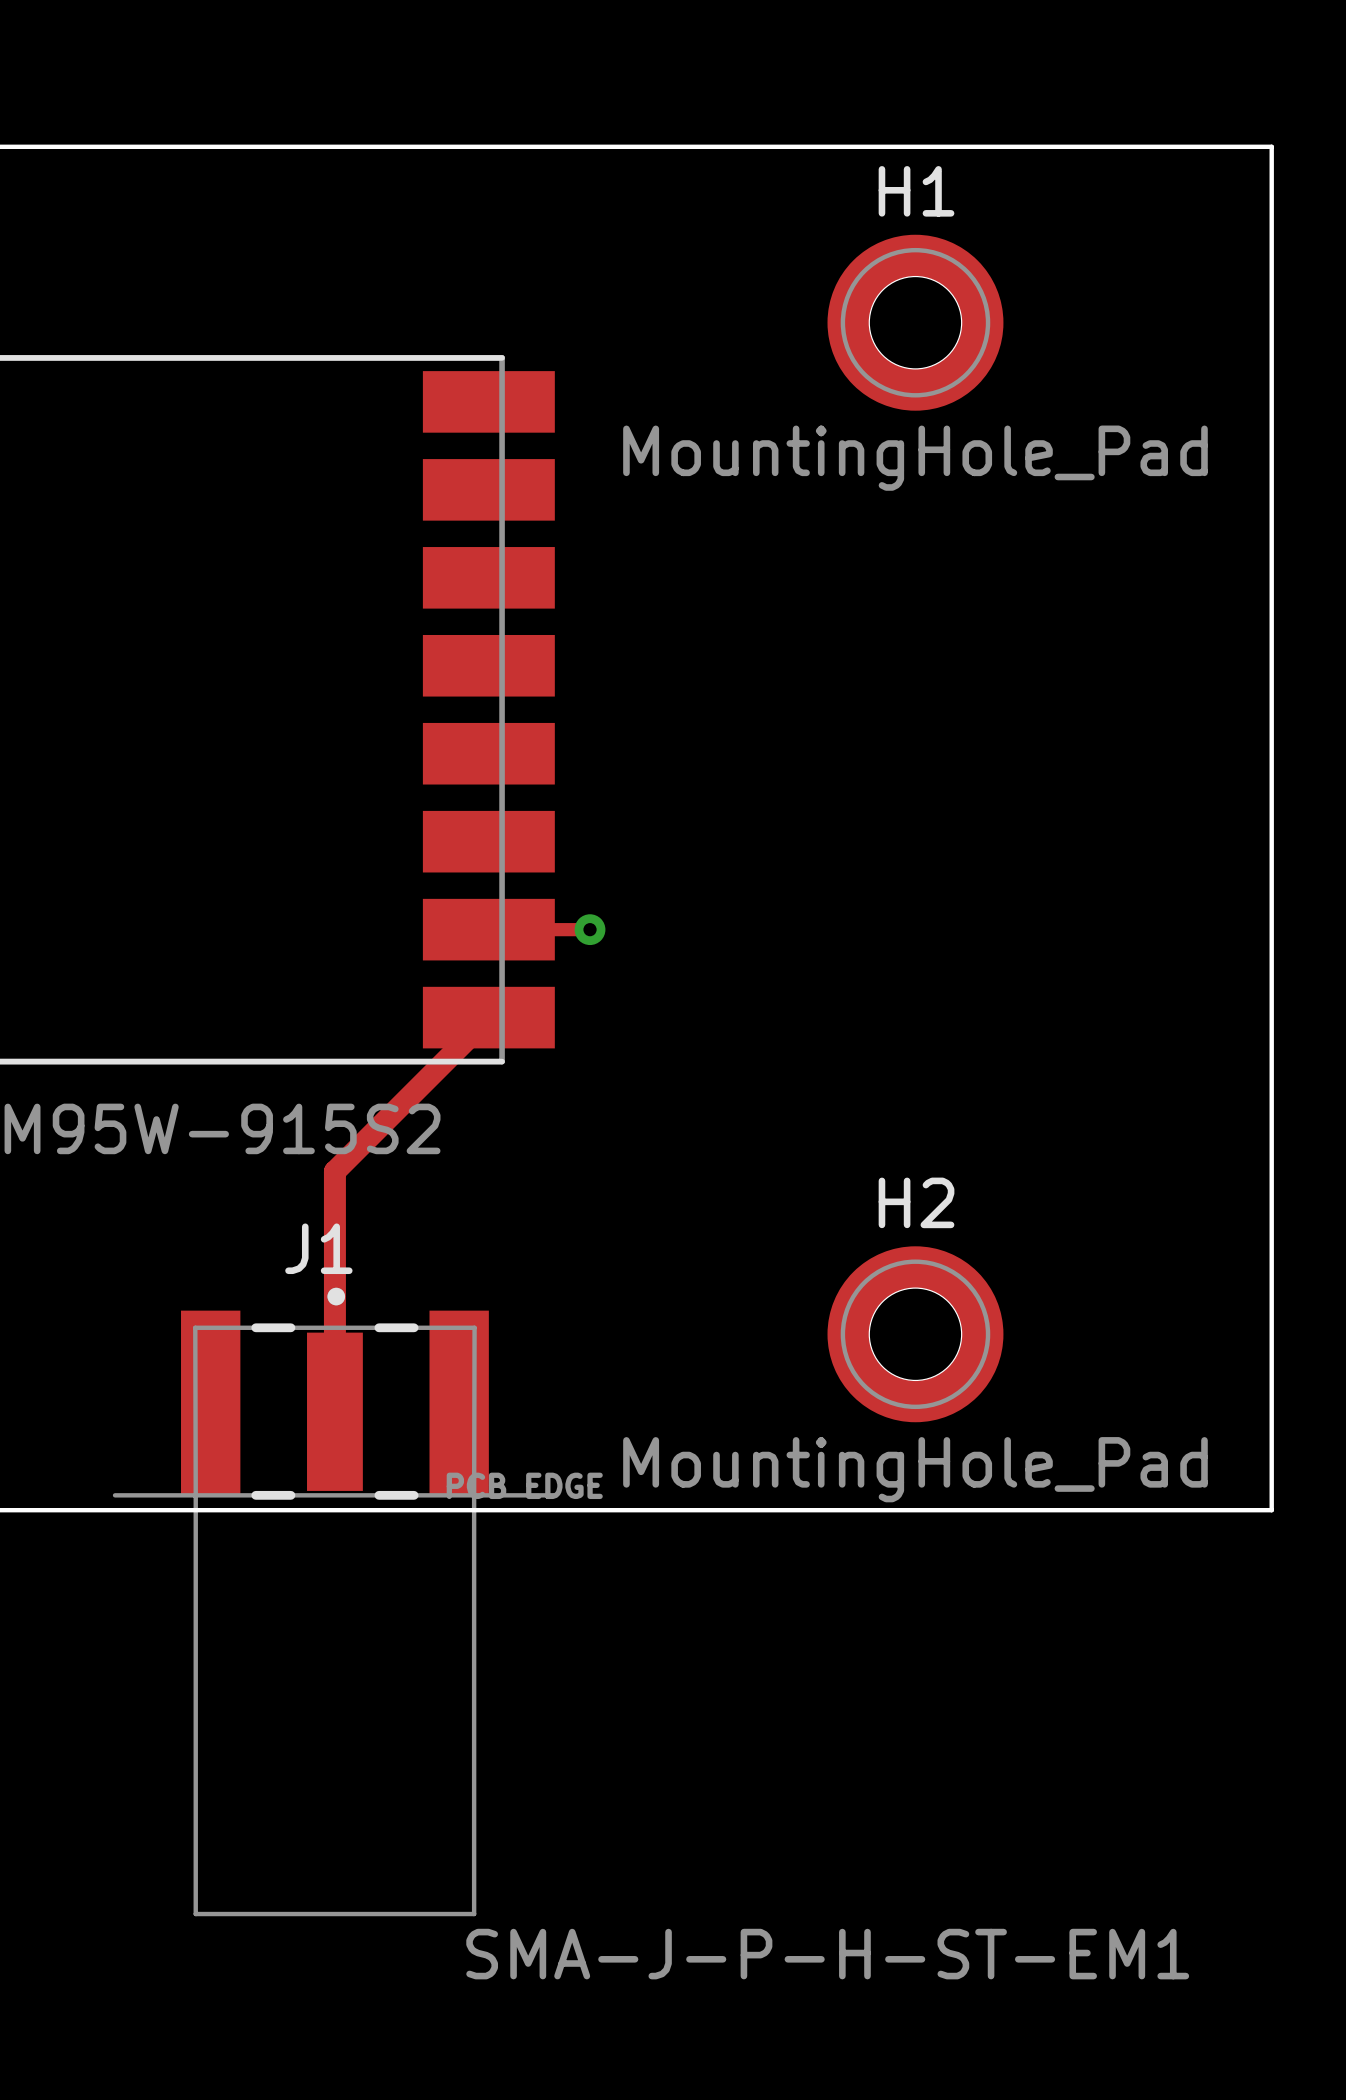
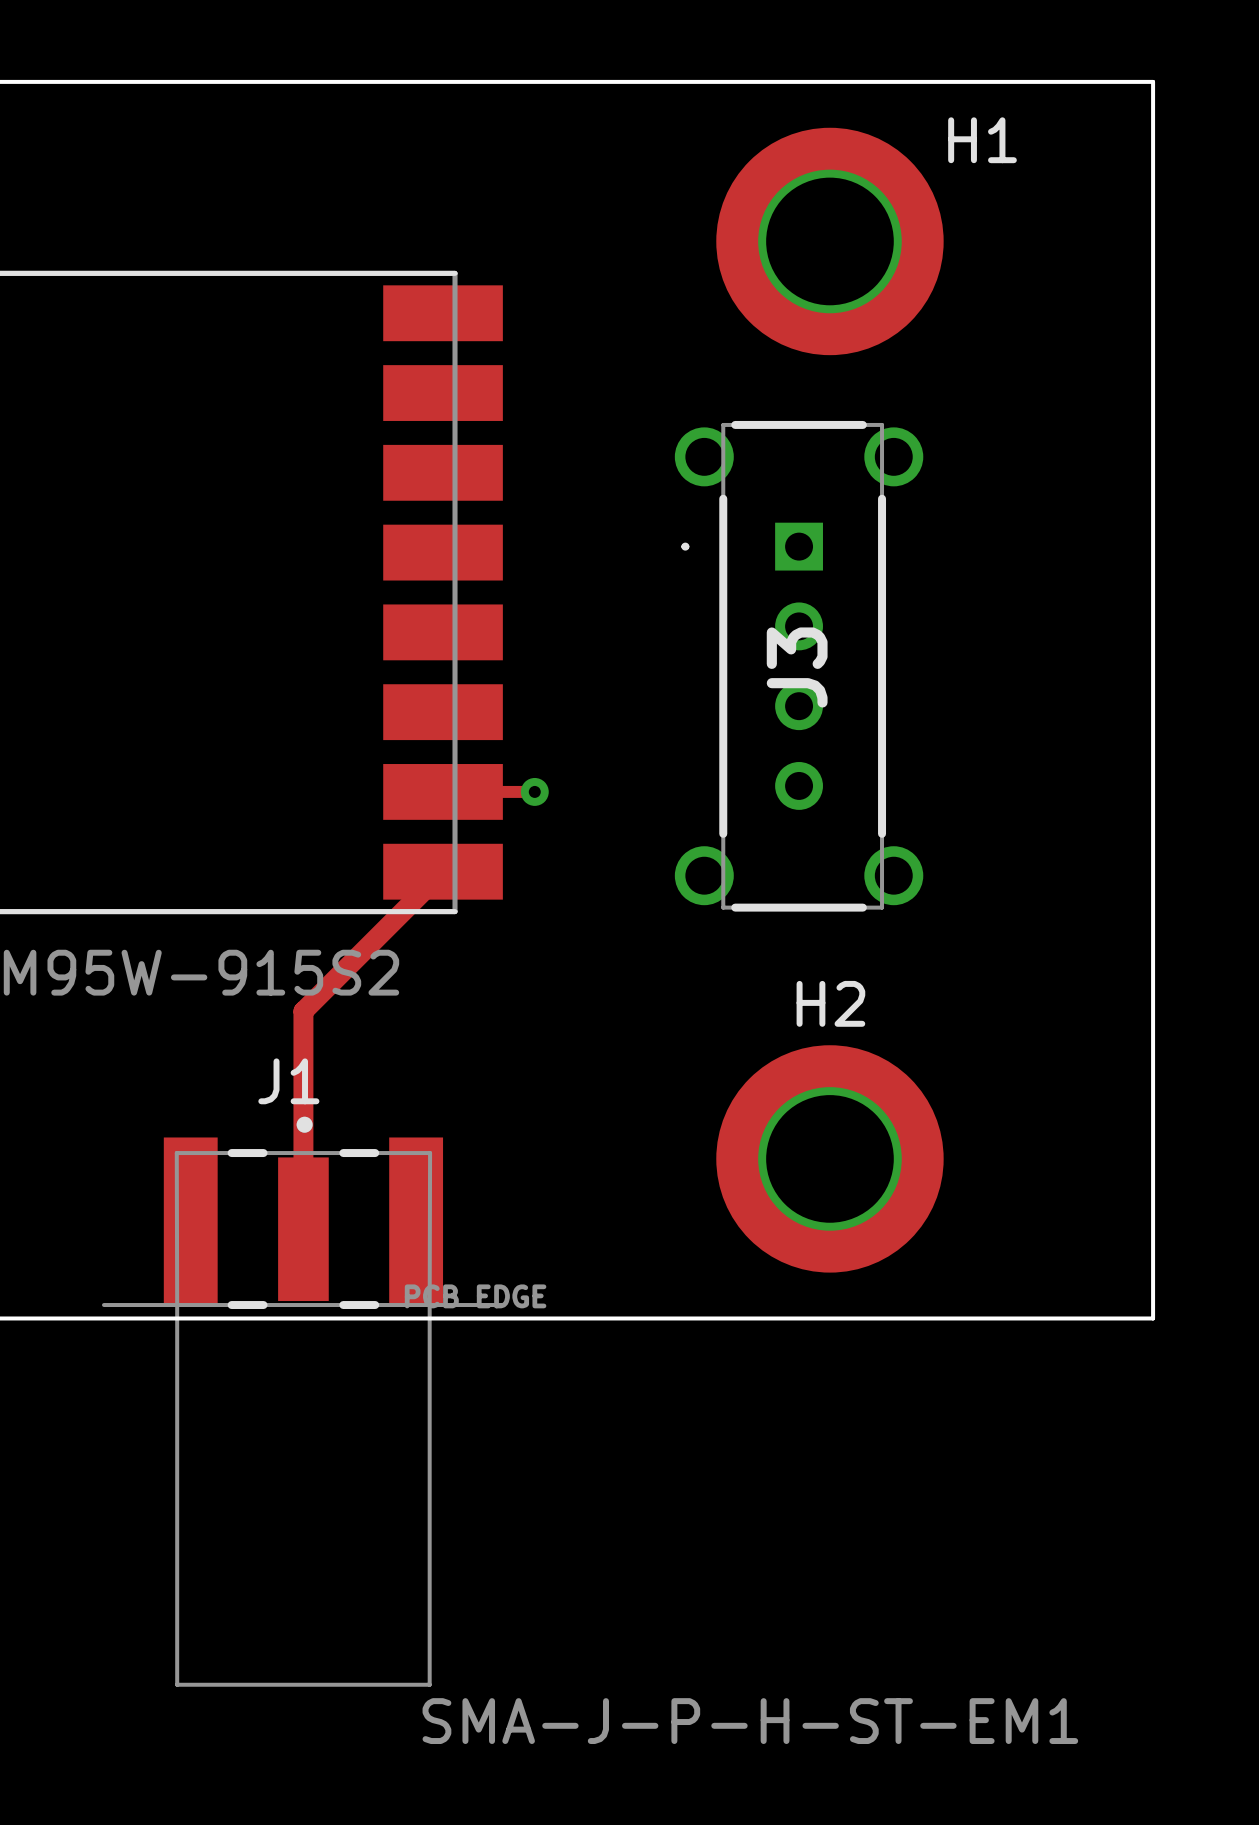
H1 name position: H1 (916, 191) -> H1 (982, 140)
H1 footprint: [827, 234, 1004, 411] -> [716, 127, 944, 356]
H1 value: MountingHole_Pad (915, 458) -> none
J3: none -> (799, 666)
H2 footprint: [827, 1246, 1004, 1423] -> [716, 1045, 944, 1273]
H2 value: MountingHole_Pad (915, 1469) -> none

